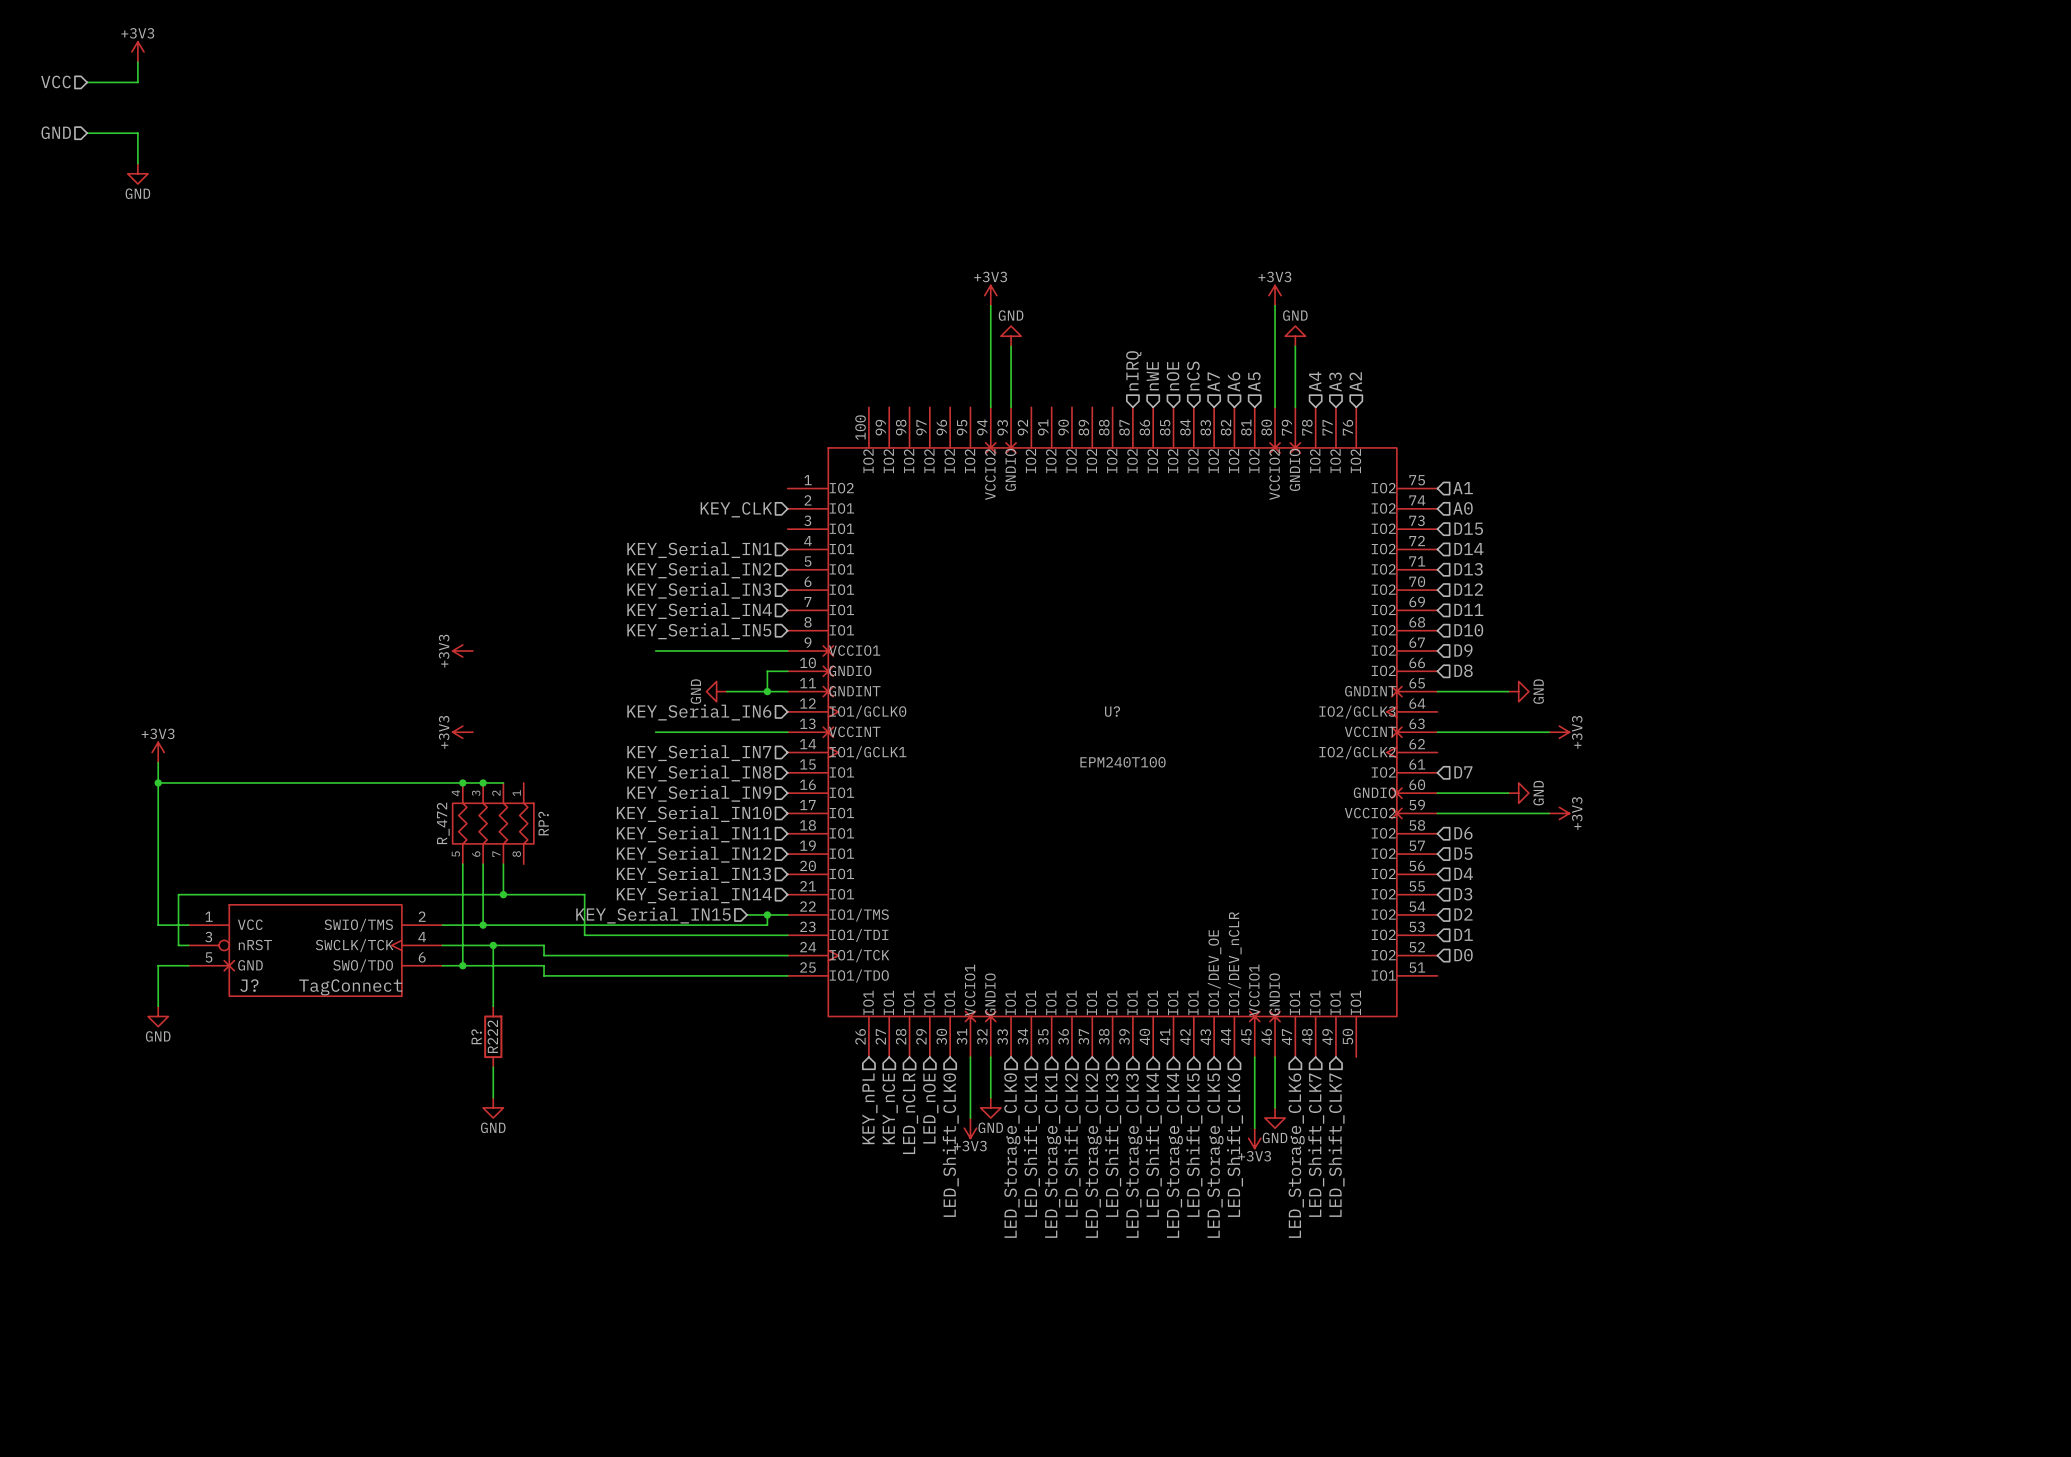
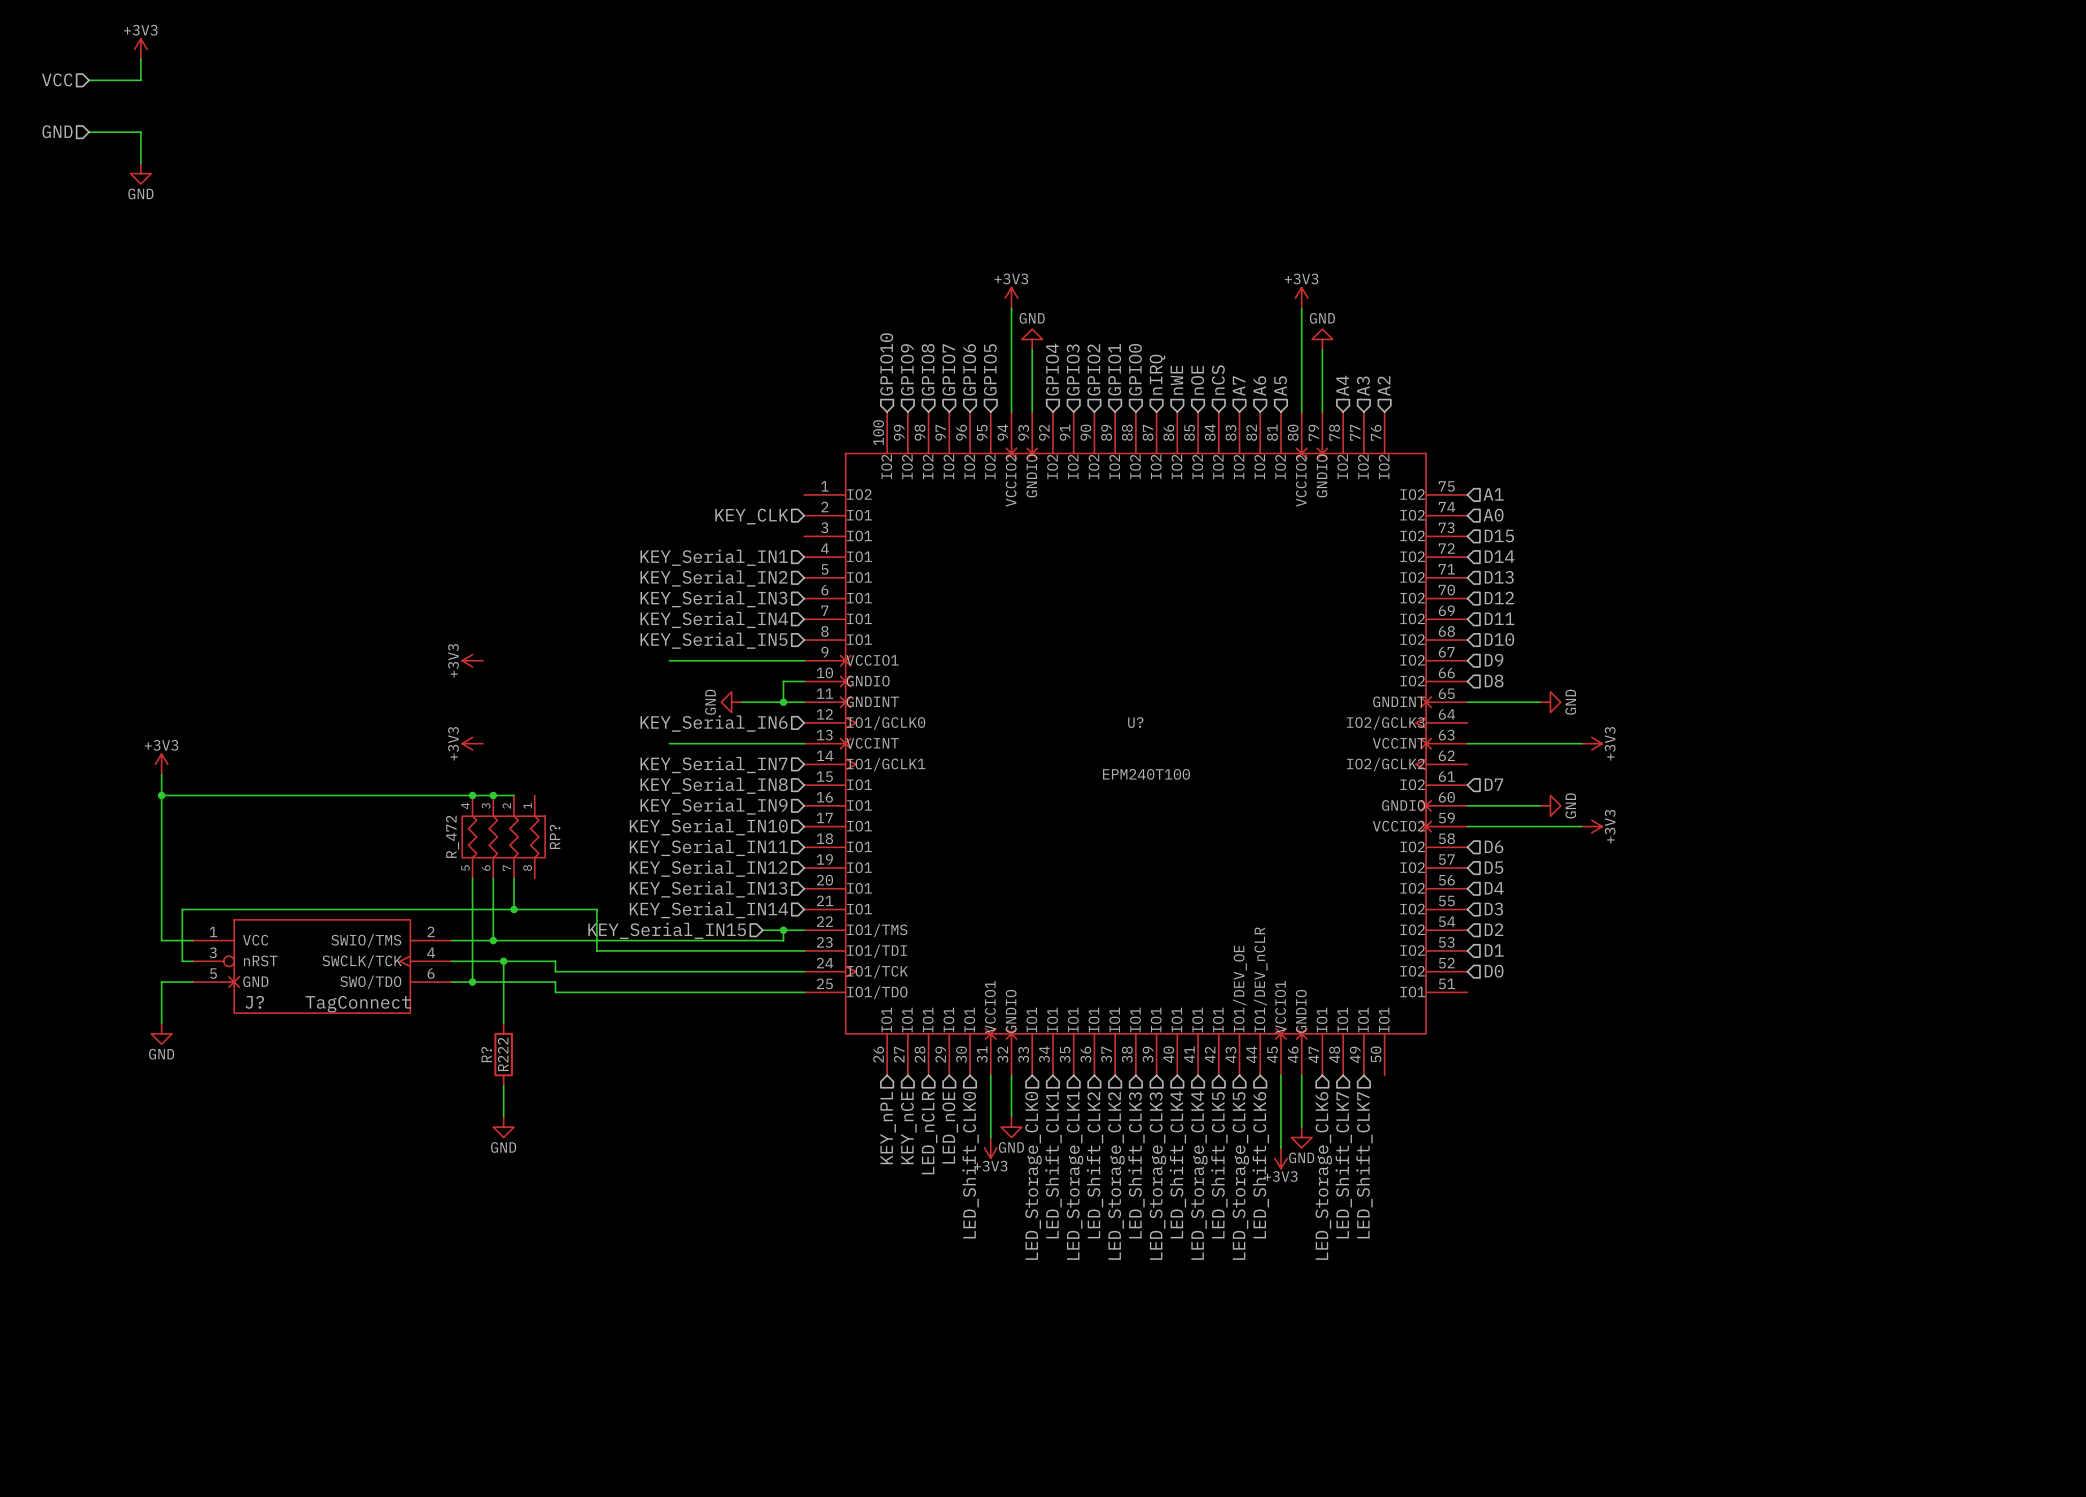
hierarchical label: none -> GPIO10 (886, 364)
hierarchical label: none -> GPIO9 (907, 369)
hierarchical label: none -> GPIO8 (928, 369)
hierarchical label: none -> GPIO6 (969, 369)
hierarchical label: none -> GPIO4 (1052, 369)
hierarchical label: none -> GPIO2 (1093, 369)
hierarchical label: none -> GPIO1 (1114, 369)
hierarchical label: none -> GPIO0 (1135, 369)
hierarchical label: none -> GPIO7 (948, 369)
hierarchical label: none -> GPIO5 (990, 369)
hierarchical label: none -> GPIO3 (1073, 369)

